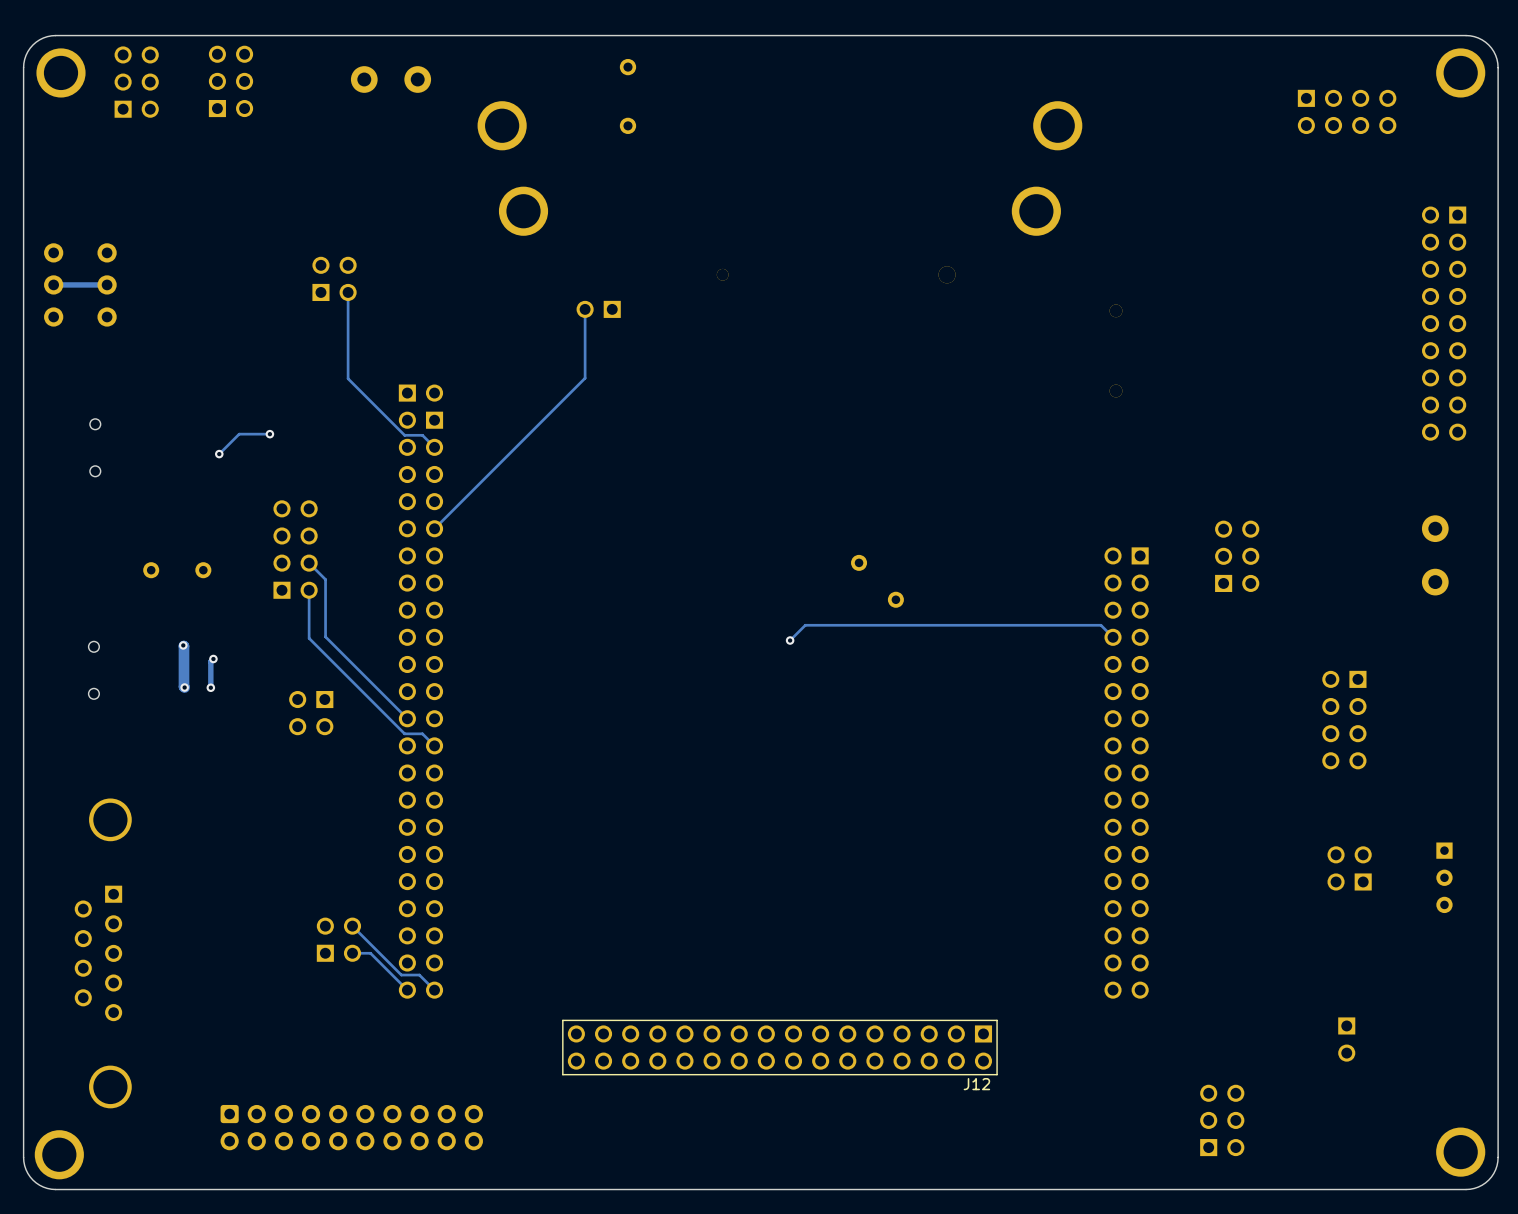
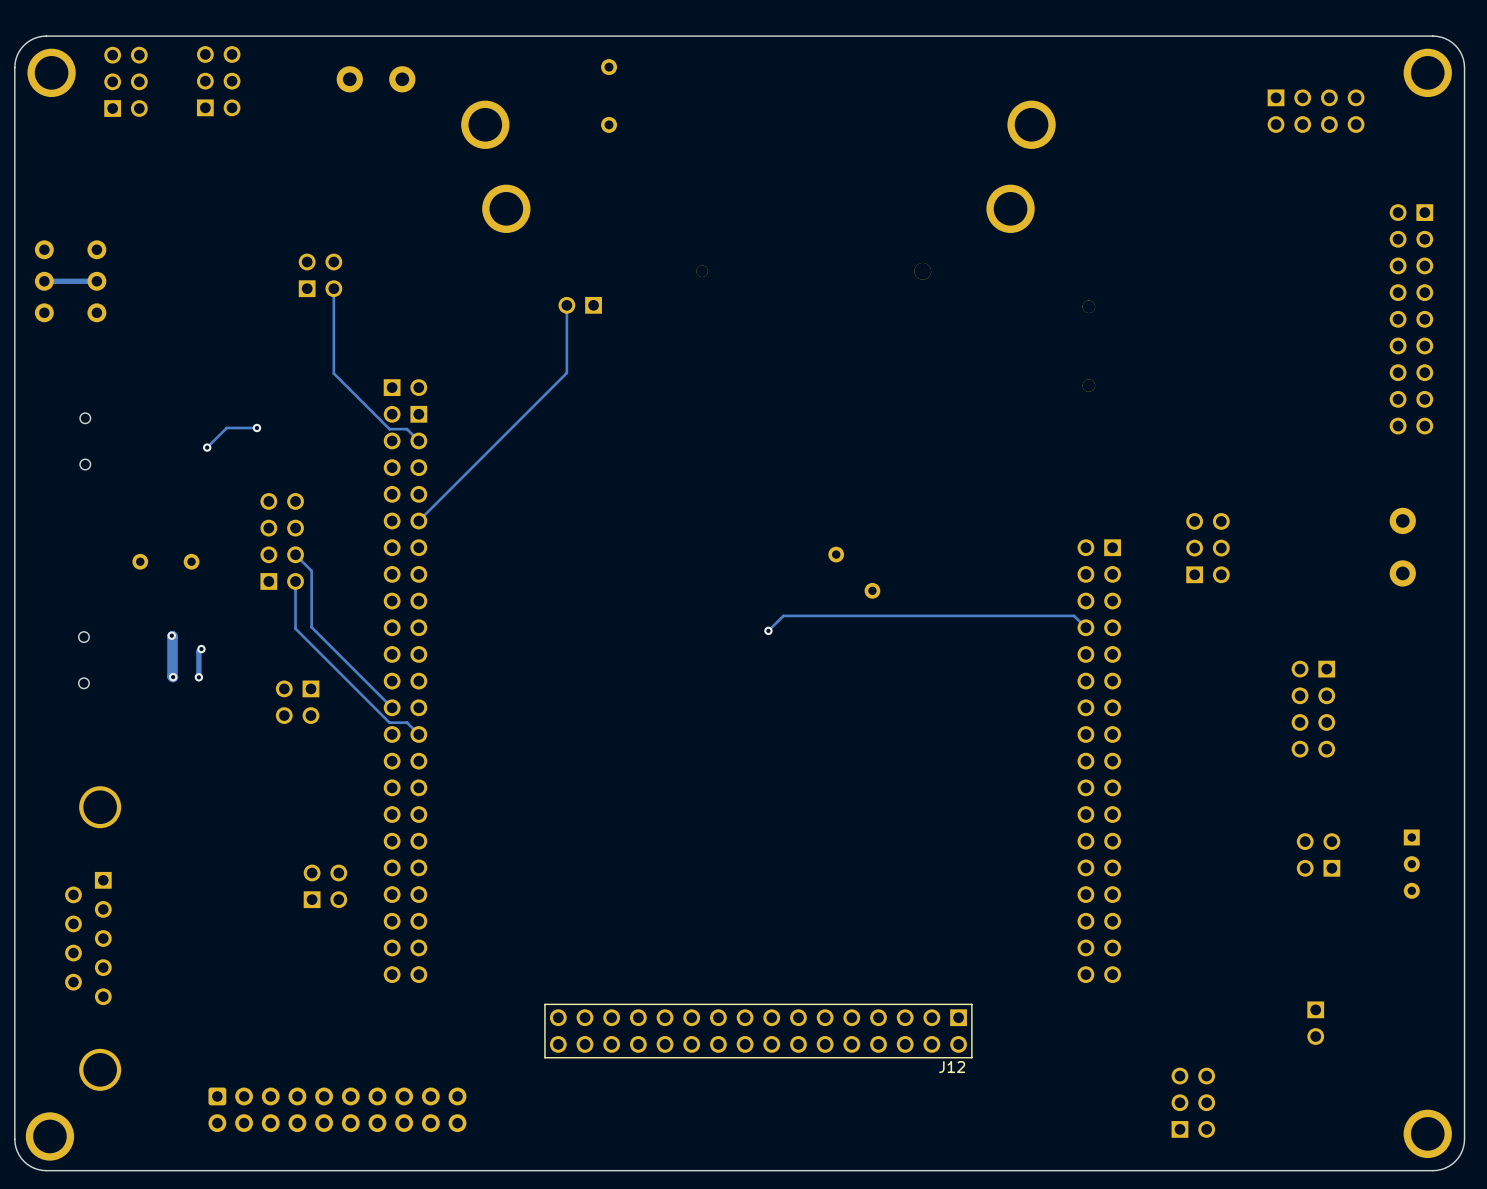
track: (352, 926) (401, 975) (419, 975) (434, 990) -> none
part position: (338, 939) -> (325, 886)
track: (352, 953) (370, 953) (407, 990) -> none

